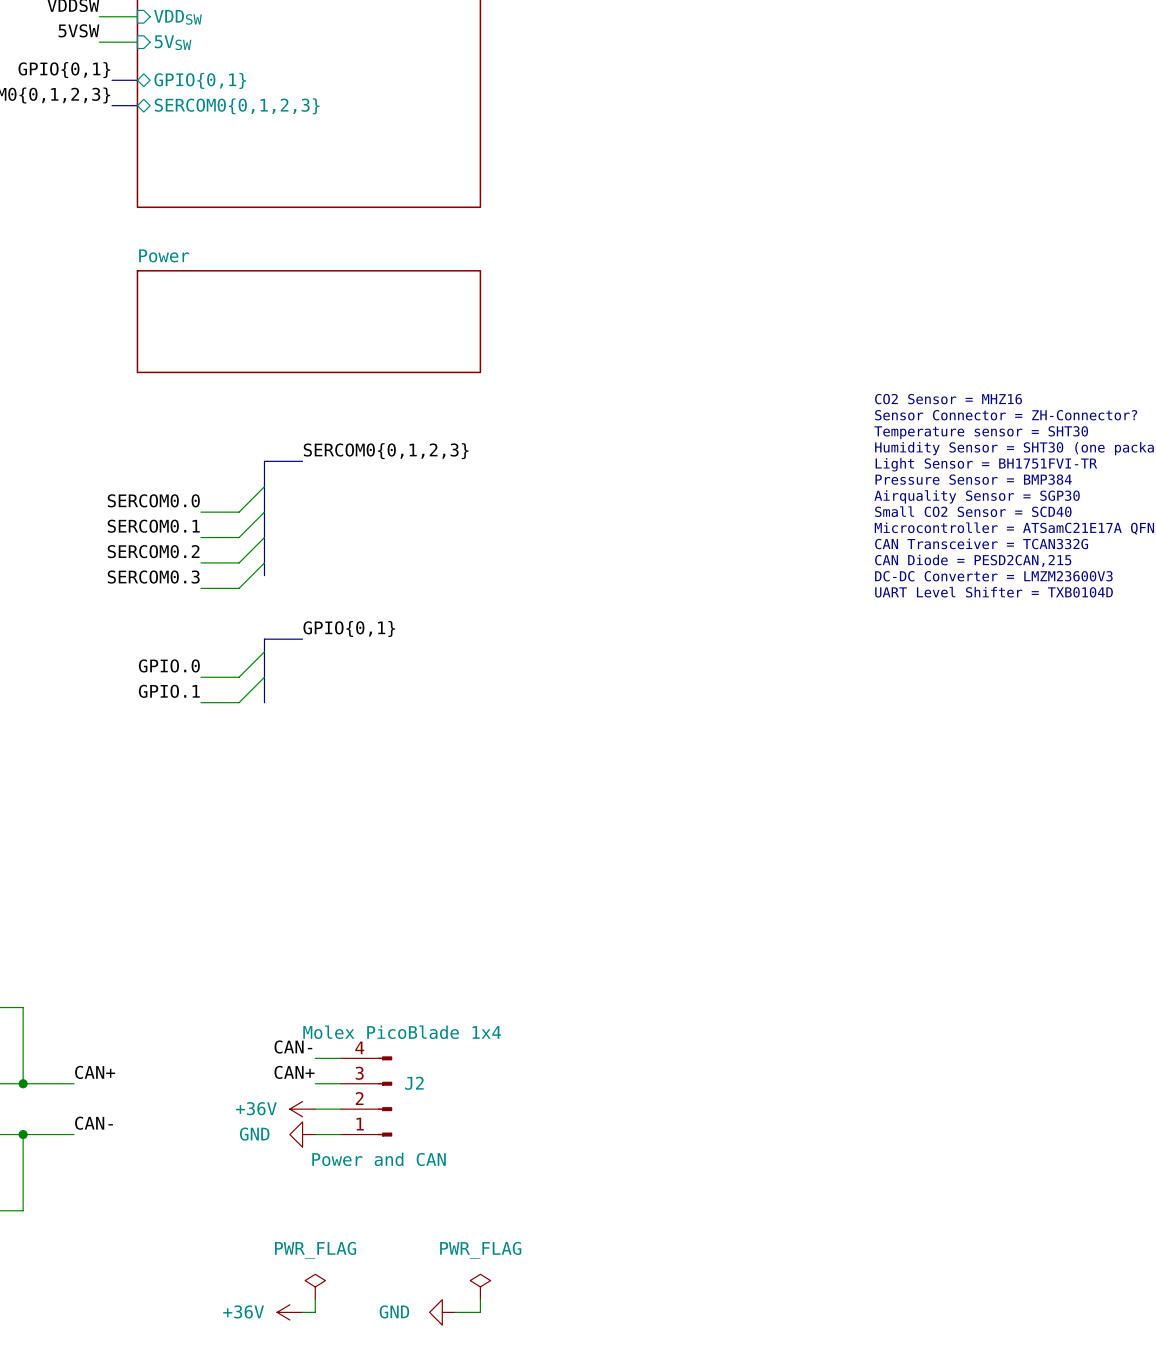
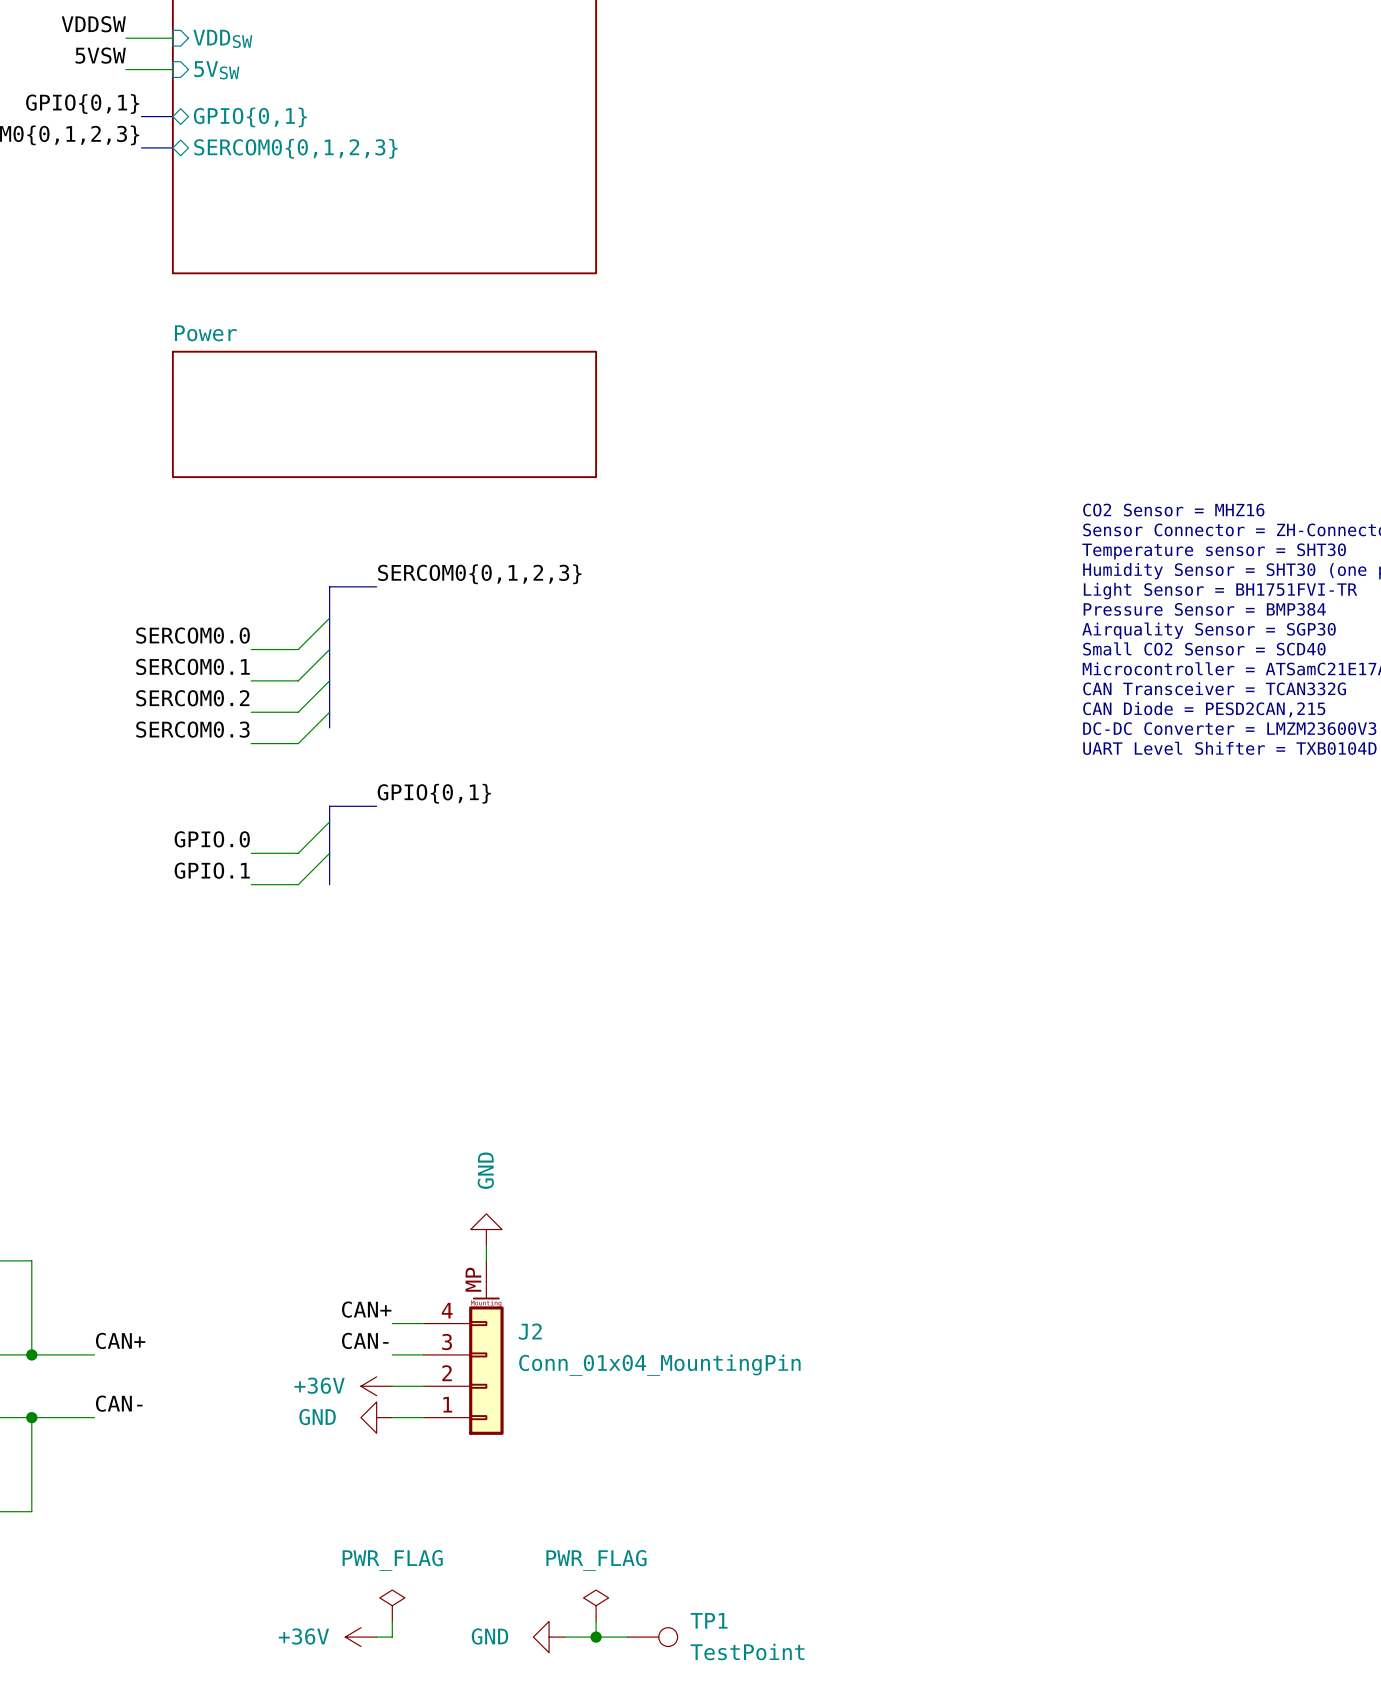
power symbol: none -> GND (486, 1229)
wire: none -> (486, 1245) (486, 1260)
J2 value: Molex PicoBlade 1x4 (402, 1032) -> Conn_01x04_MountingPin (659, 1365)
label: CAN- (293, 1047) -> CAN+ (366, 1309)
J2 symbol: [340, 1056, 393, 1137] -> [423, 1260, 504, 1435]
label: CAN+ (294, 1072) -> CAN- (365, 1340)
J2 text: Power and CAN (379, 1159) -> none
wire: none -> (596, 1637) (627, 1637)
junction: none -> (596, 1637)
TP1: none -> TestPoint (652, 1637)

